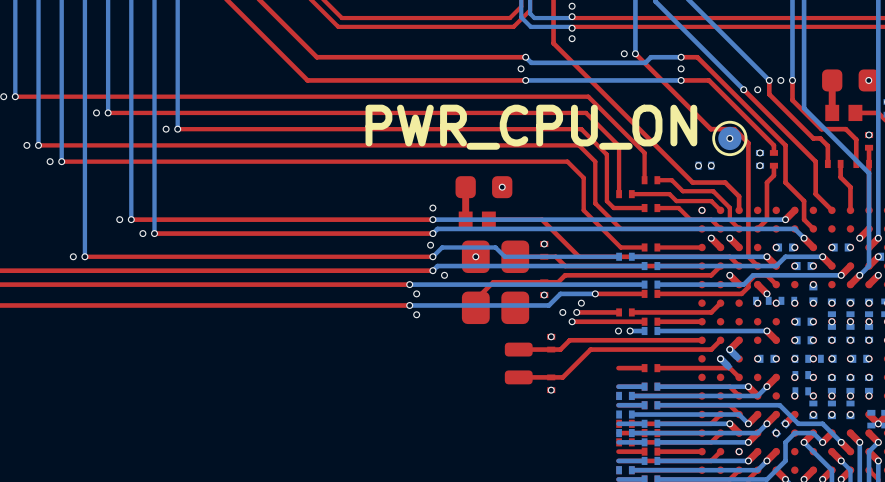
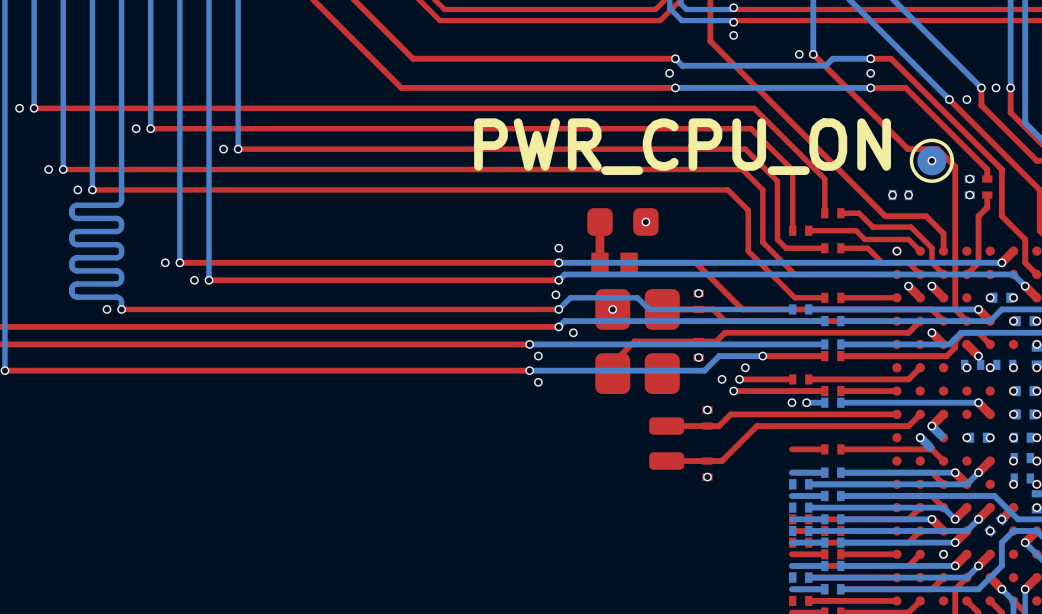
bottom track: (84, 169) (84, 188) -> (121, 200) (117, 205) (76, 205) (71, 210) (72, 215) (75, 218) (117, 218) (121, 223)
bottom track: (84, 190) (84, 209) -> (121, 226) (117, 231) (76, 231) (71, 236) (72, 242) (75, 244) (117, 244) (121, 249)
bottom track: (84, 211) (84, 230) -> (121, 252) (117, 257) (76, 257) (71, 263) (72, 268) (75, 270) (117, 270) (121, 276)
bottom track: (84, 232) (84, 251) -> (121, 278) (117, 283) (76, 284) (71, 289) (72, 294) (75, 296) (117, 297) (121, 302)

